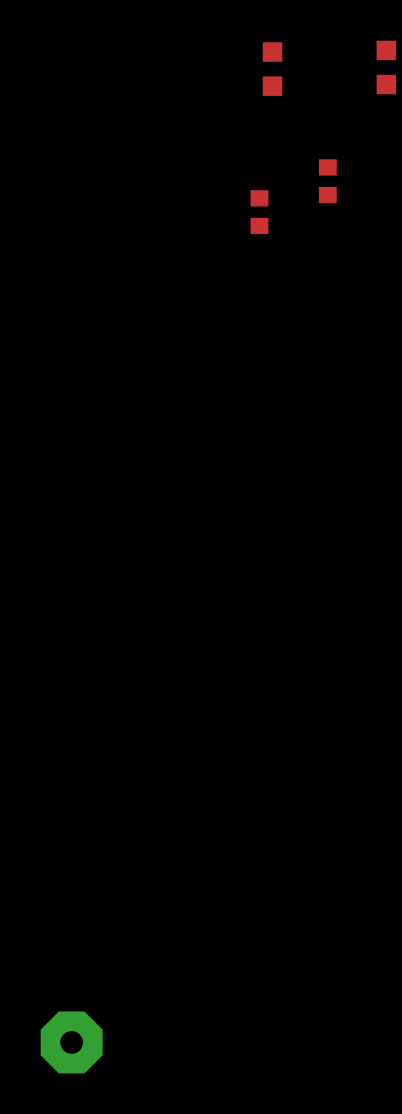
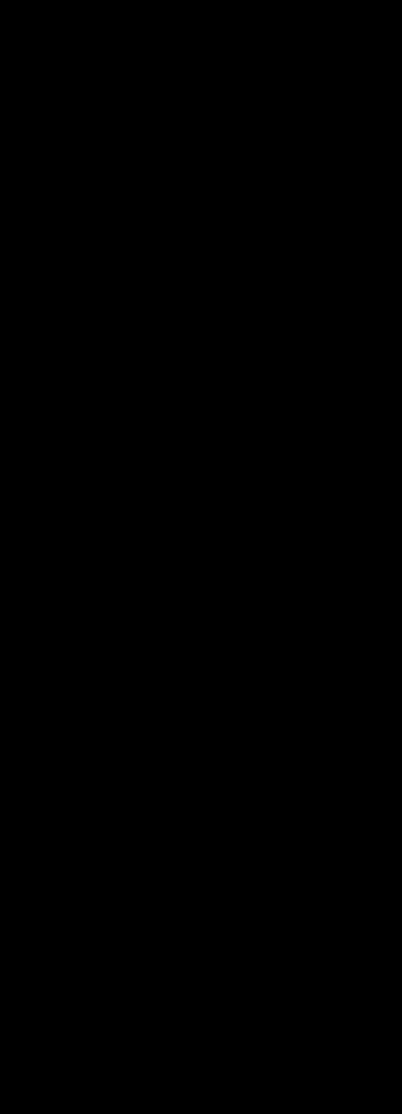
part: (386, 67) -> none
part: (272, 69) -> none
part: (327, 181) -> none
part: (259, 212) -> none
part: (71, 1042) -> none

